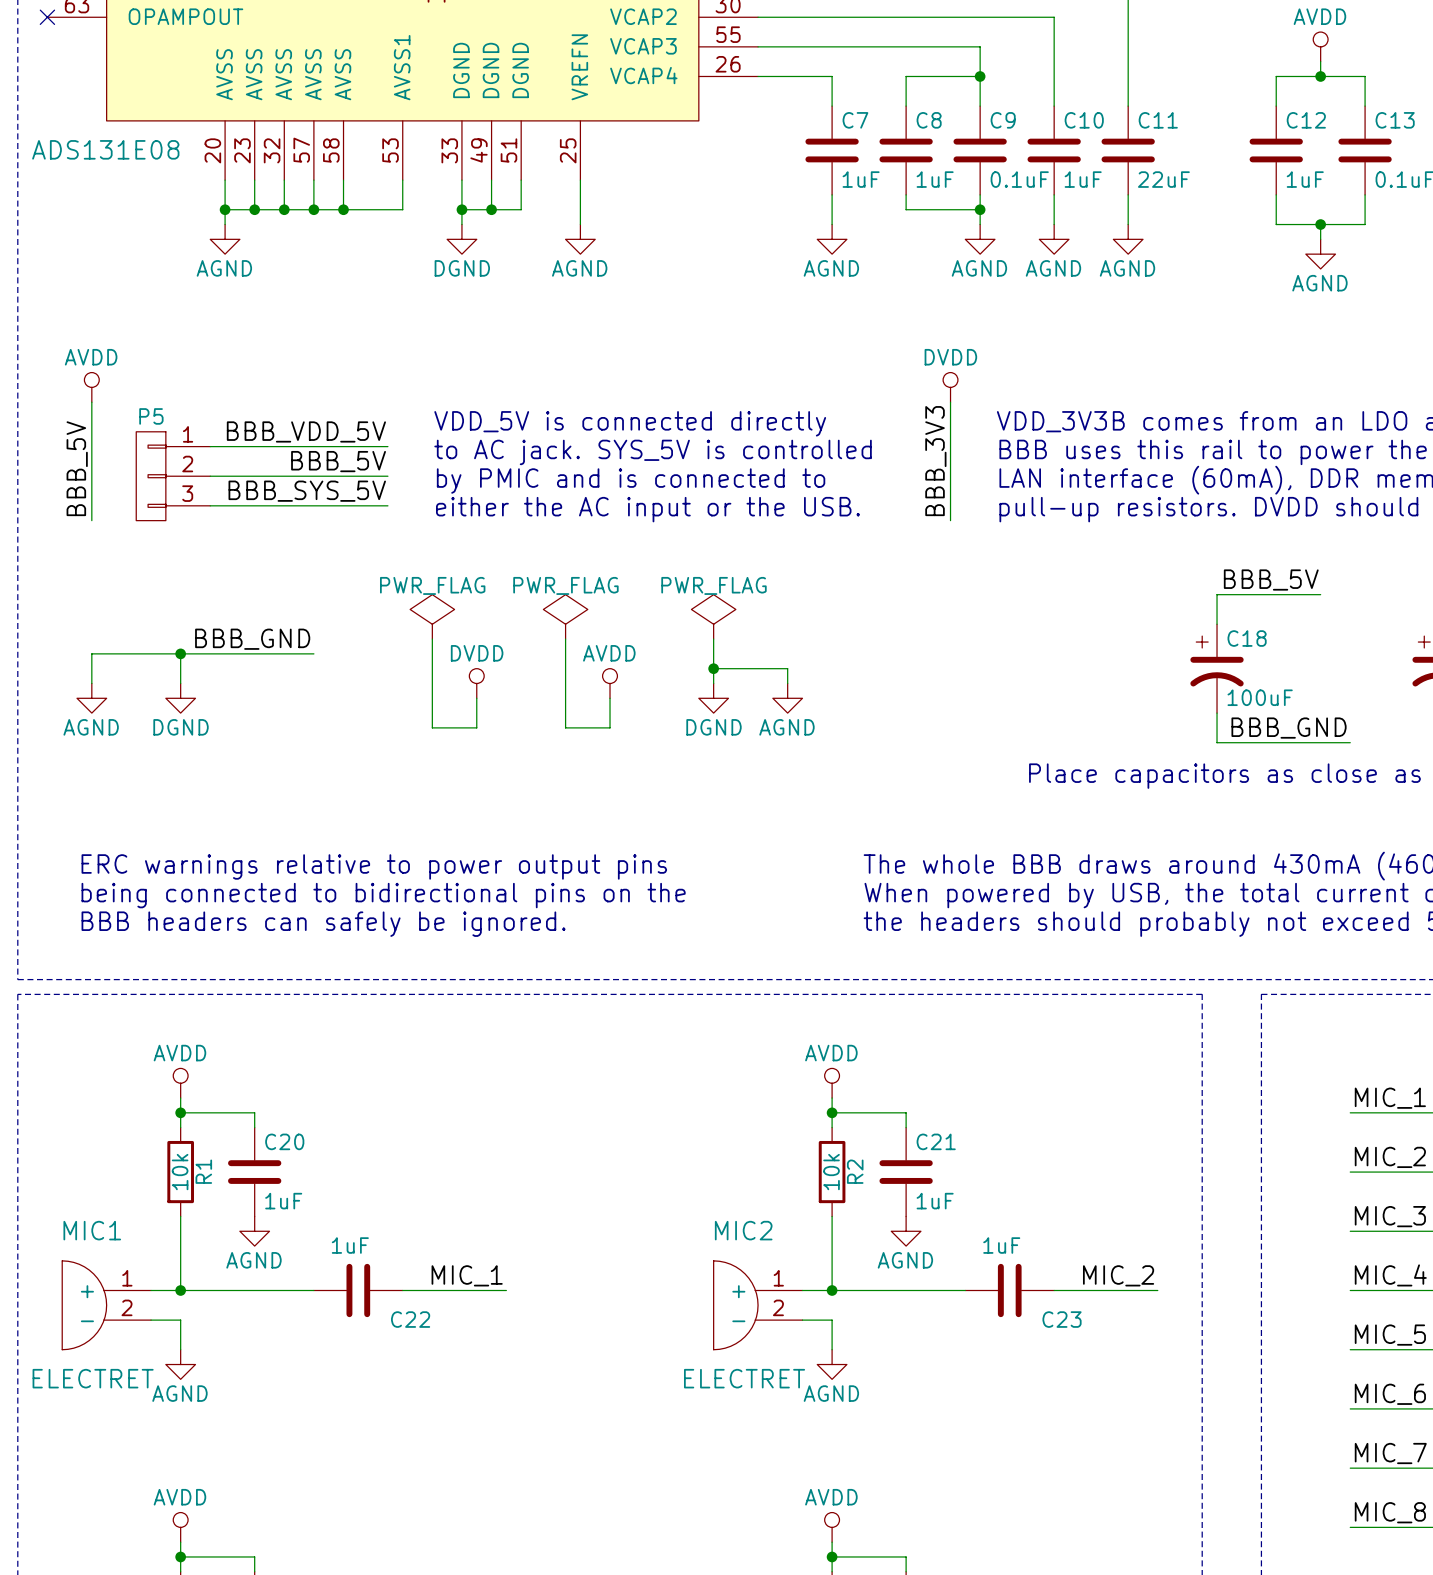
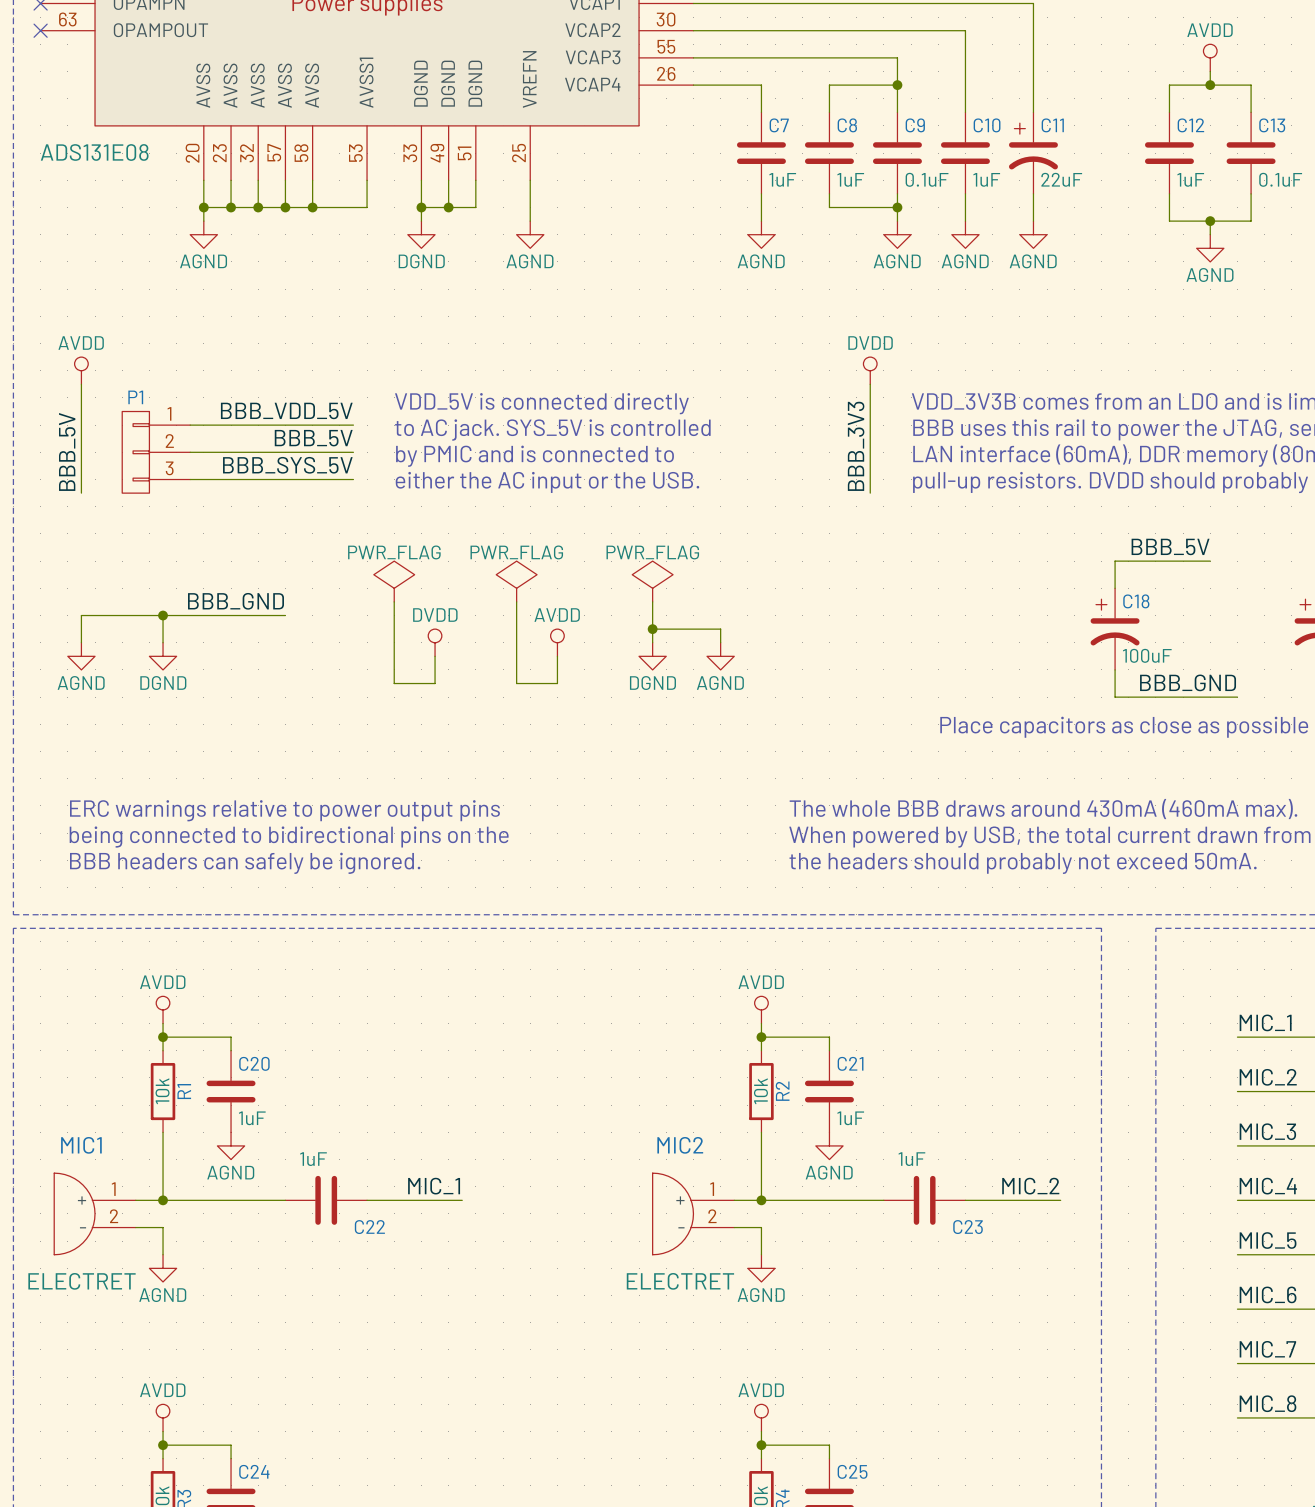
C11 symbol: [1101, 106, 1155, 195] -> [1008, 112, 1058, 194]
P5 name: P5 (151, 416) -> P1 (135, 397)

